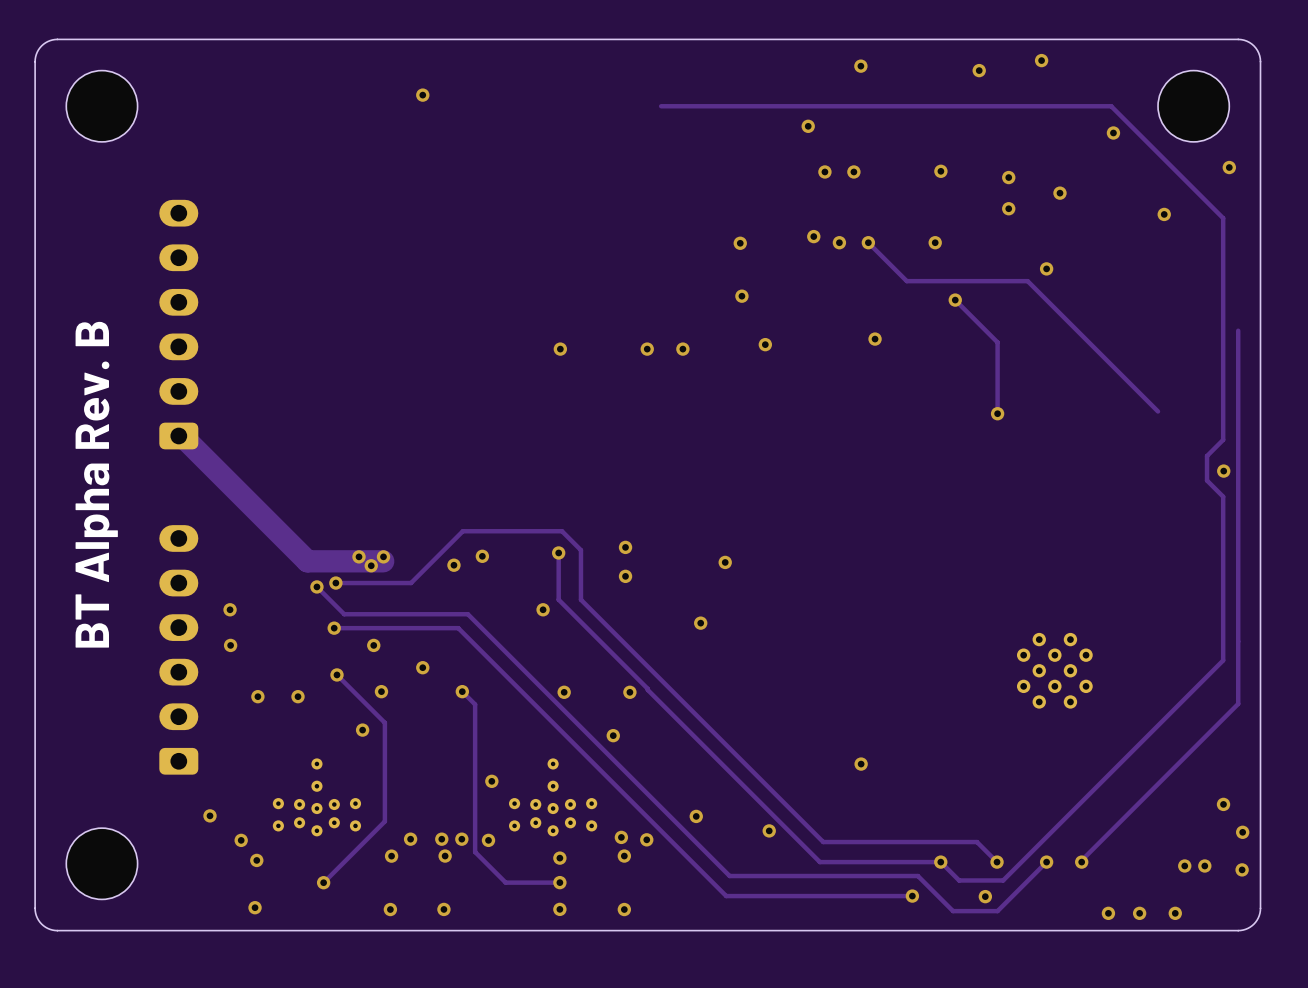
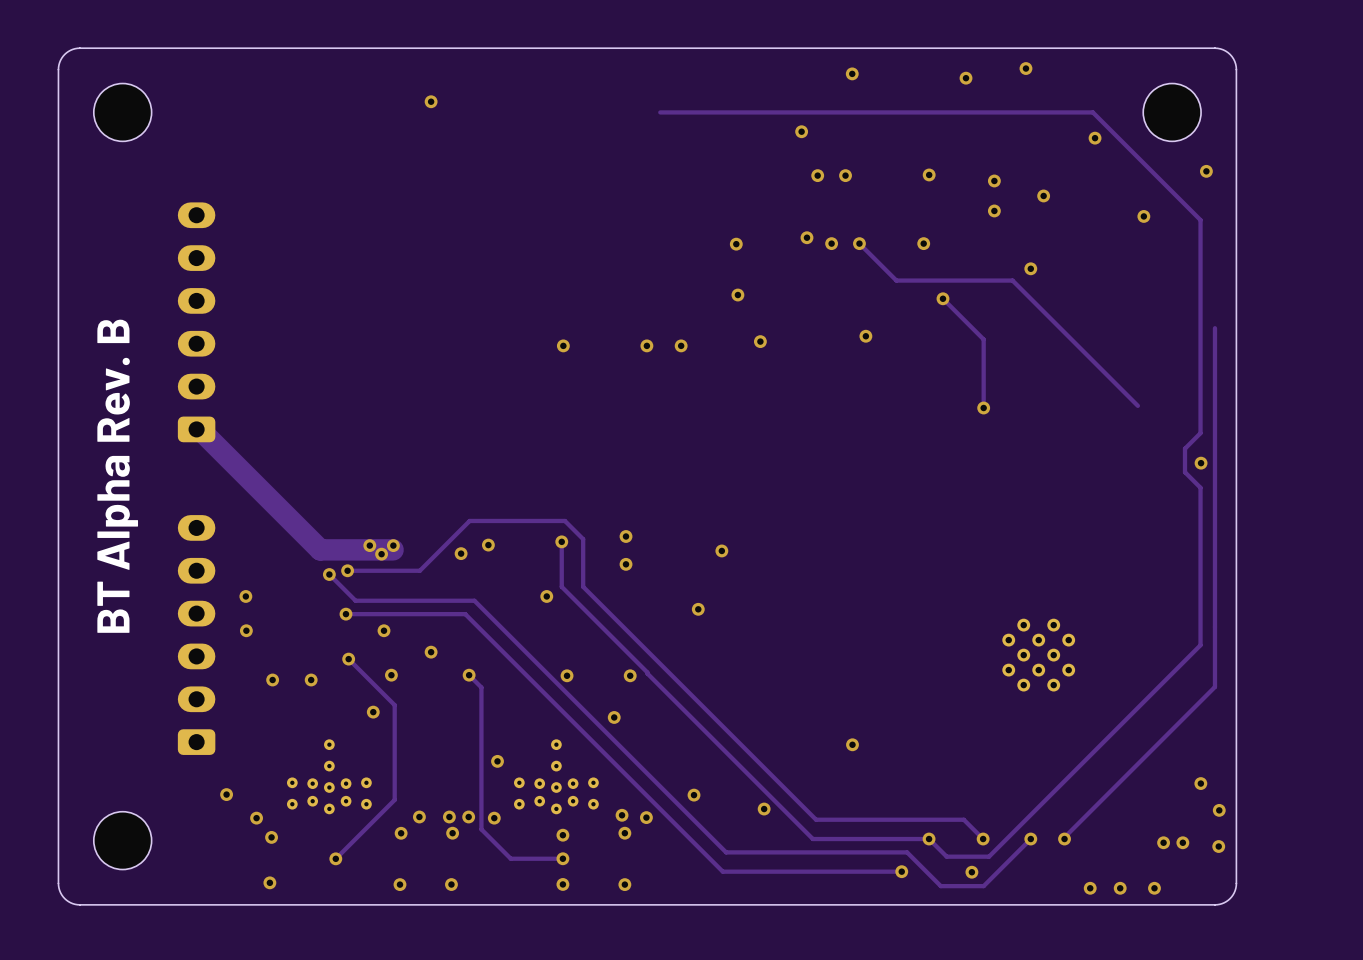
part footprint: [66, 70, 138, 142] -> [93, 83, 152, 142]
part footprint: [1158, 70, 1230, 142] -> [1143, 83, 1202, 142]
part footprint: [66, 828, 138, 900] -> [93, 811, 152, 870]

